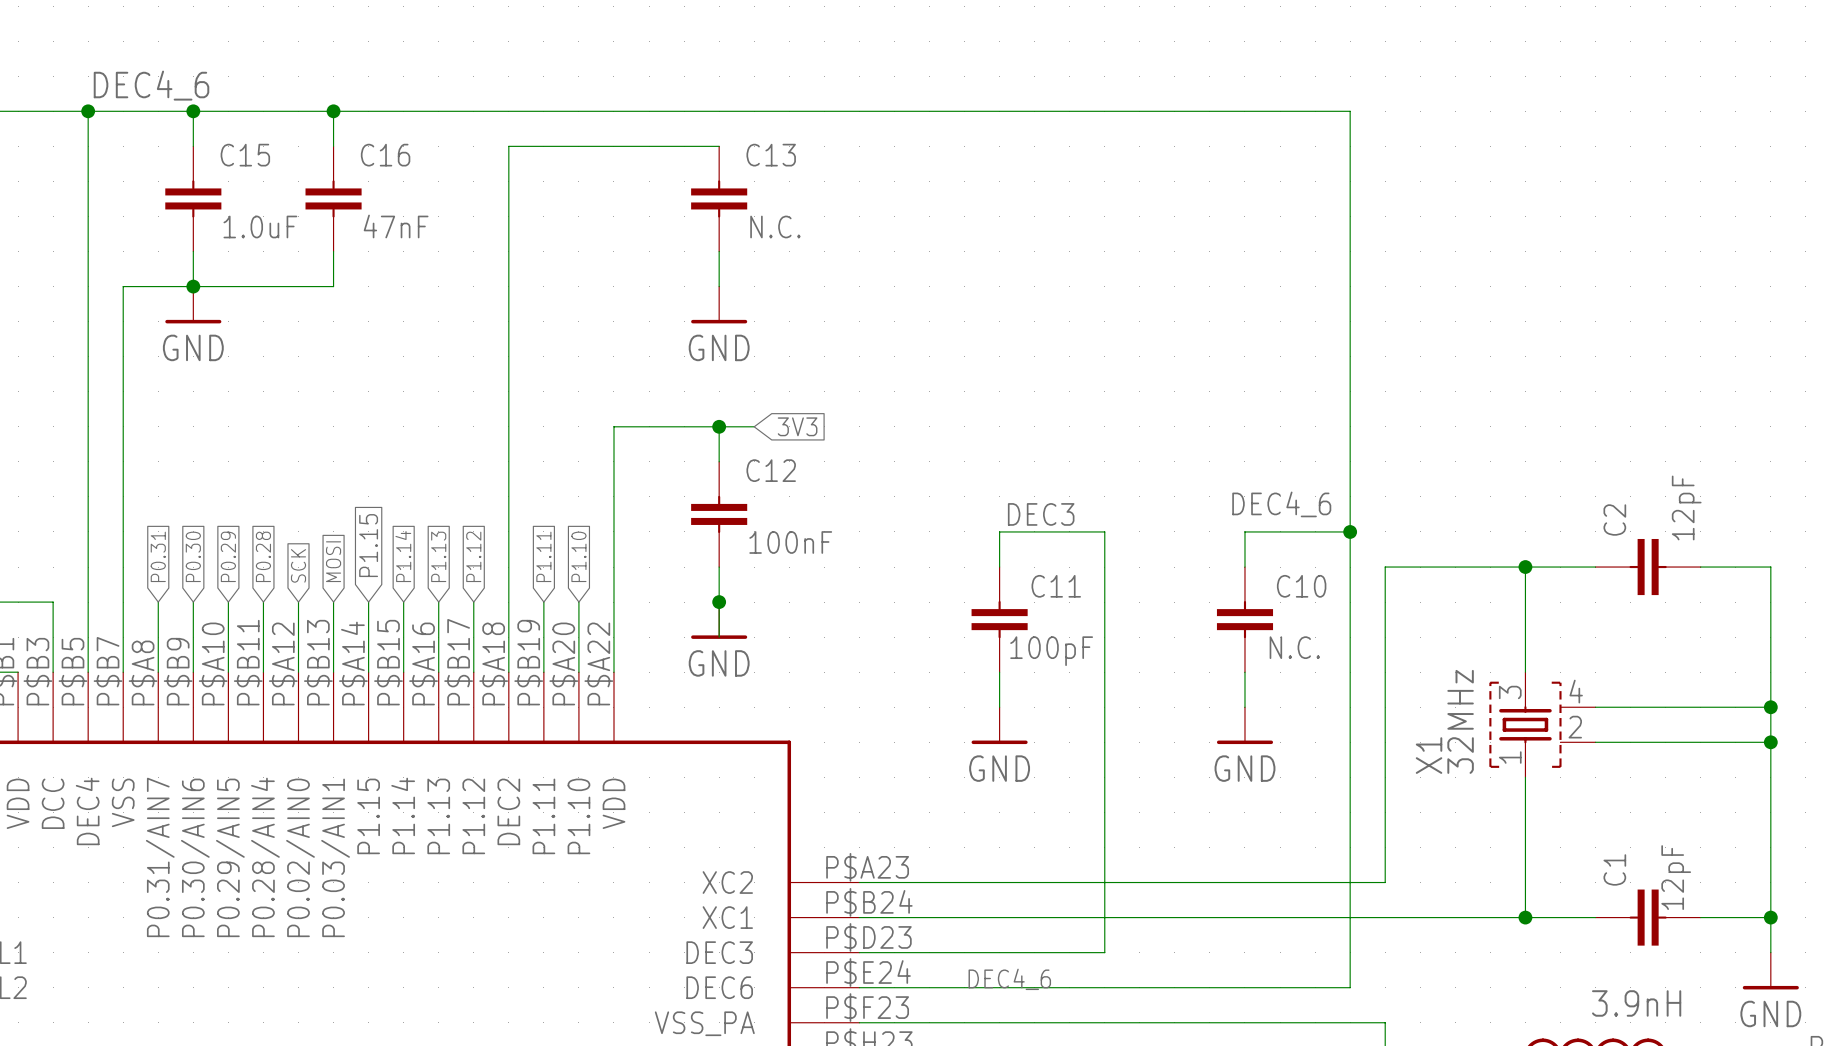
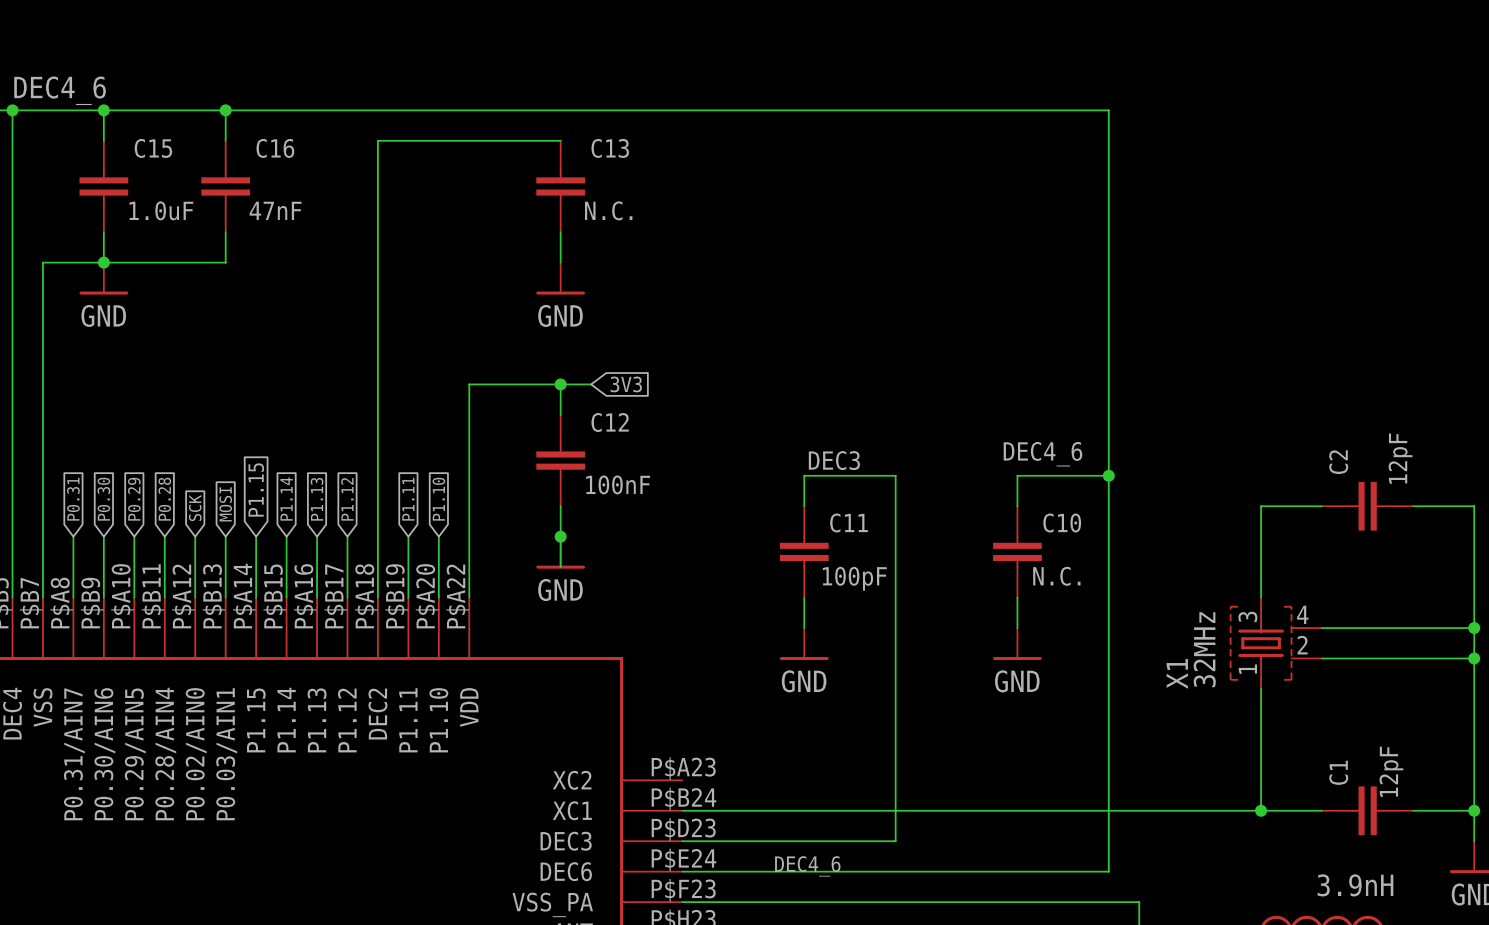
wire: (1525, 567) (1385, 567) (1385, 882) (859, 882) -> none
junction: (1525, 567) -> none

